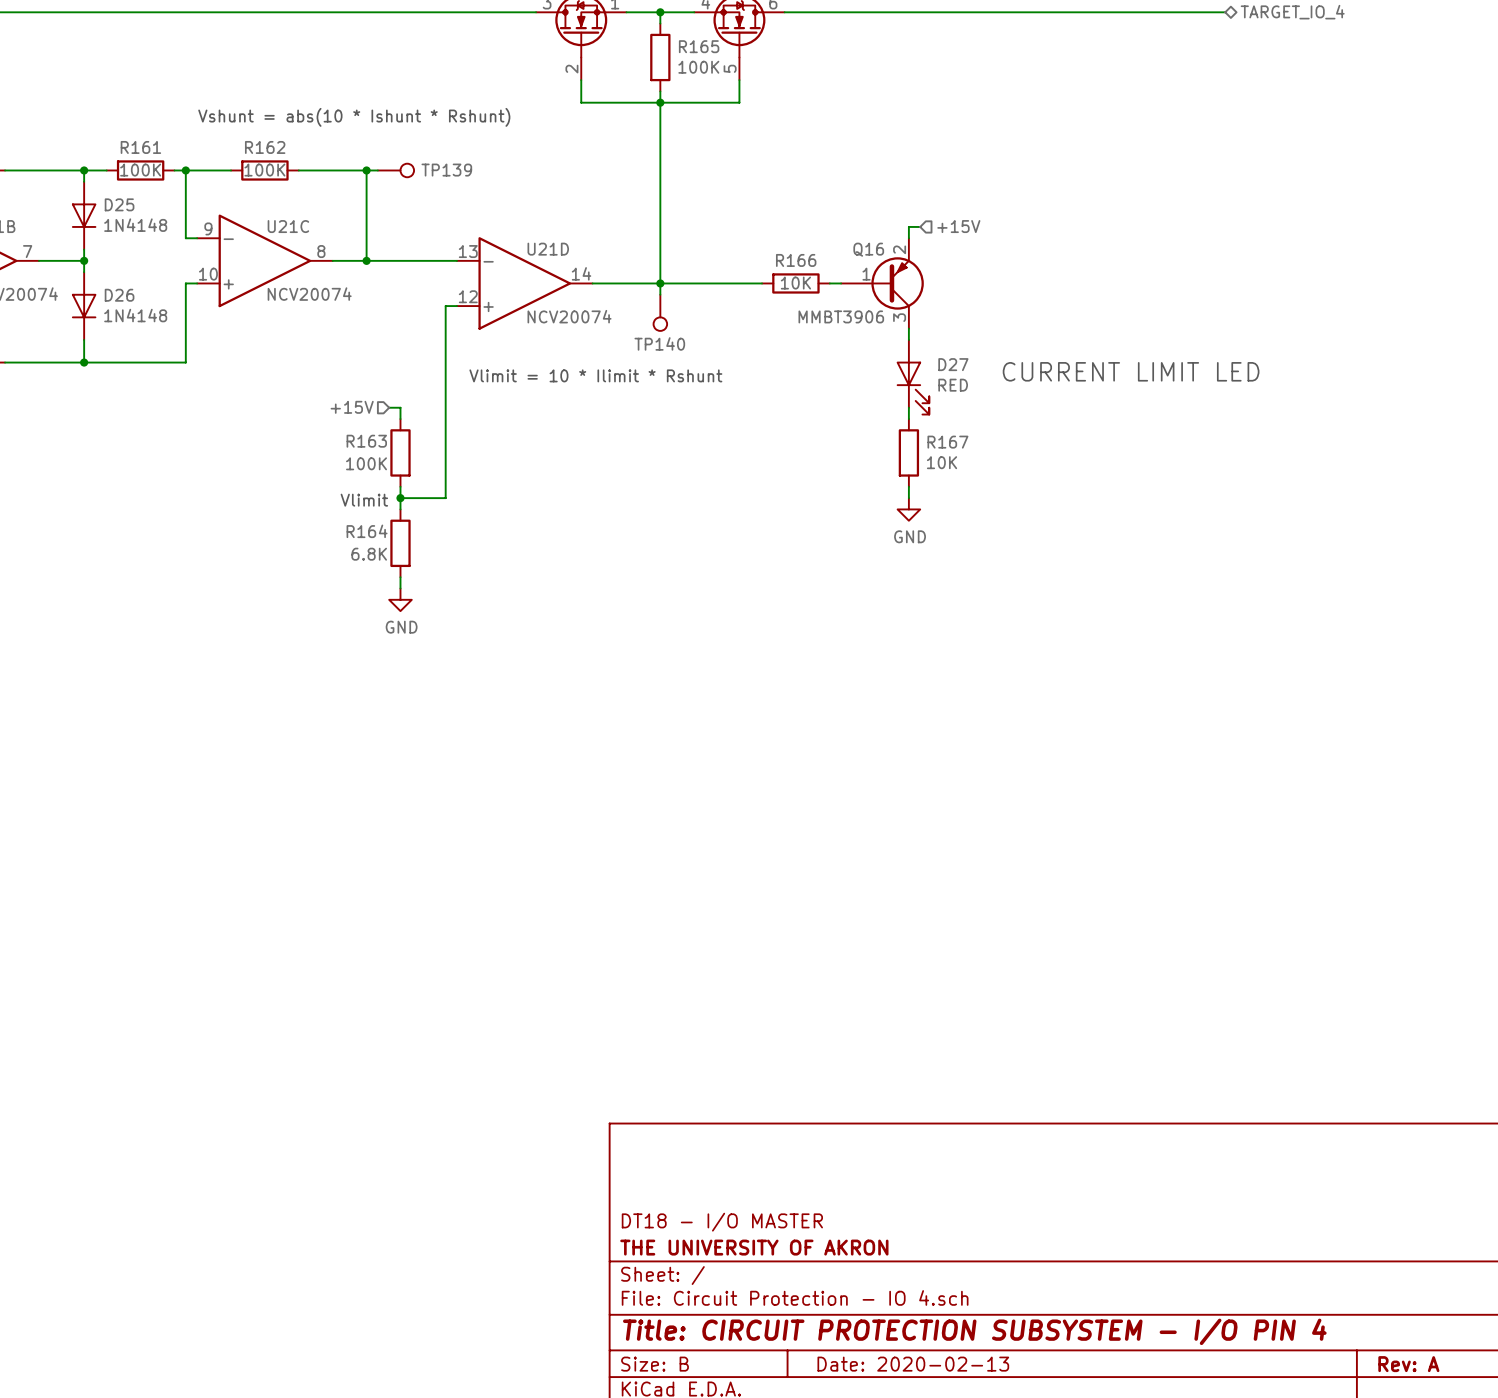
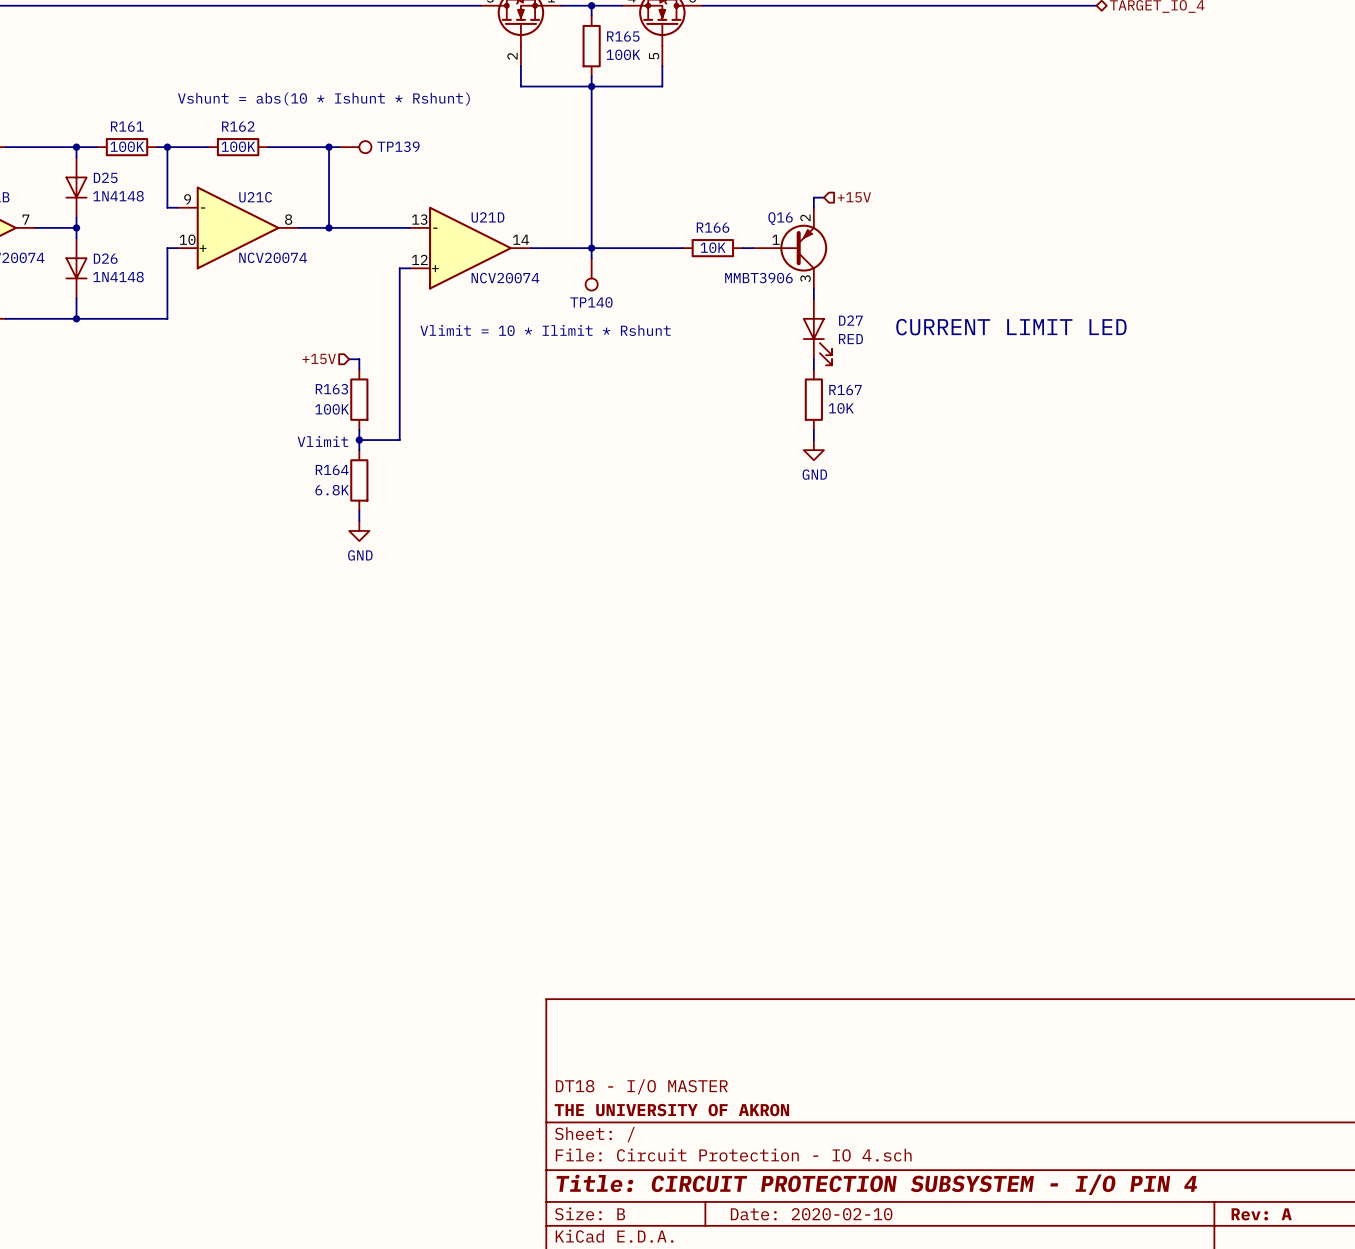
title block: Date: 2020-02-13 (913, 1364) -> Date: 2020-02-10 (811, 1214)

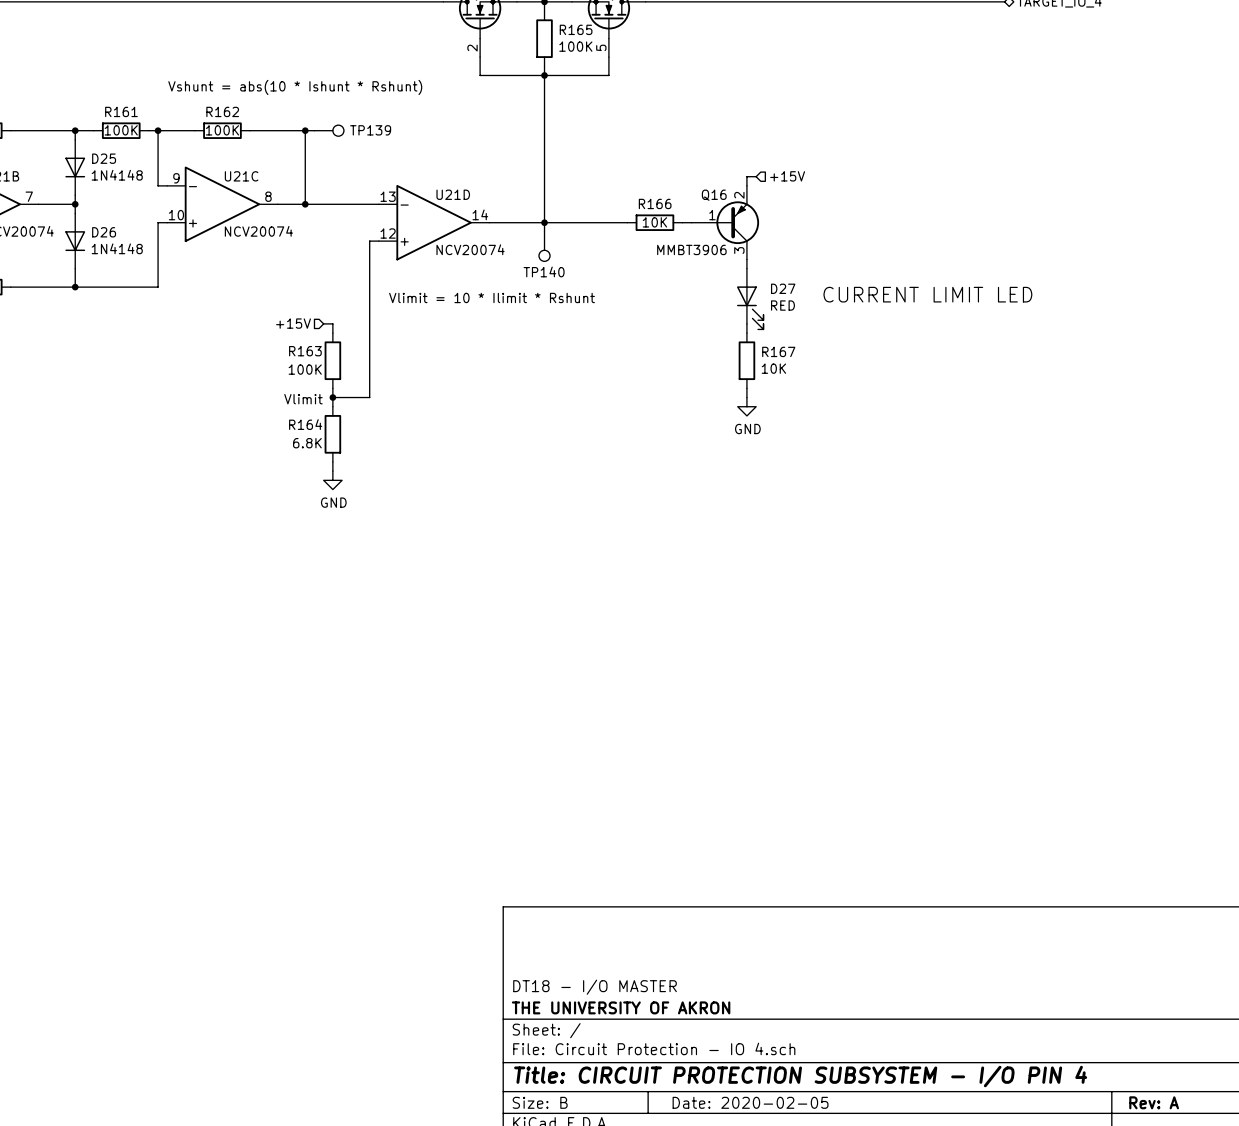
title block: Date: 2020-02-10 (811, 1214) -> Date: 2020-02-05 (750, 1102)

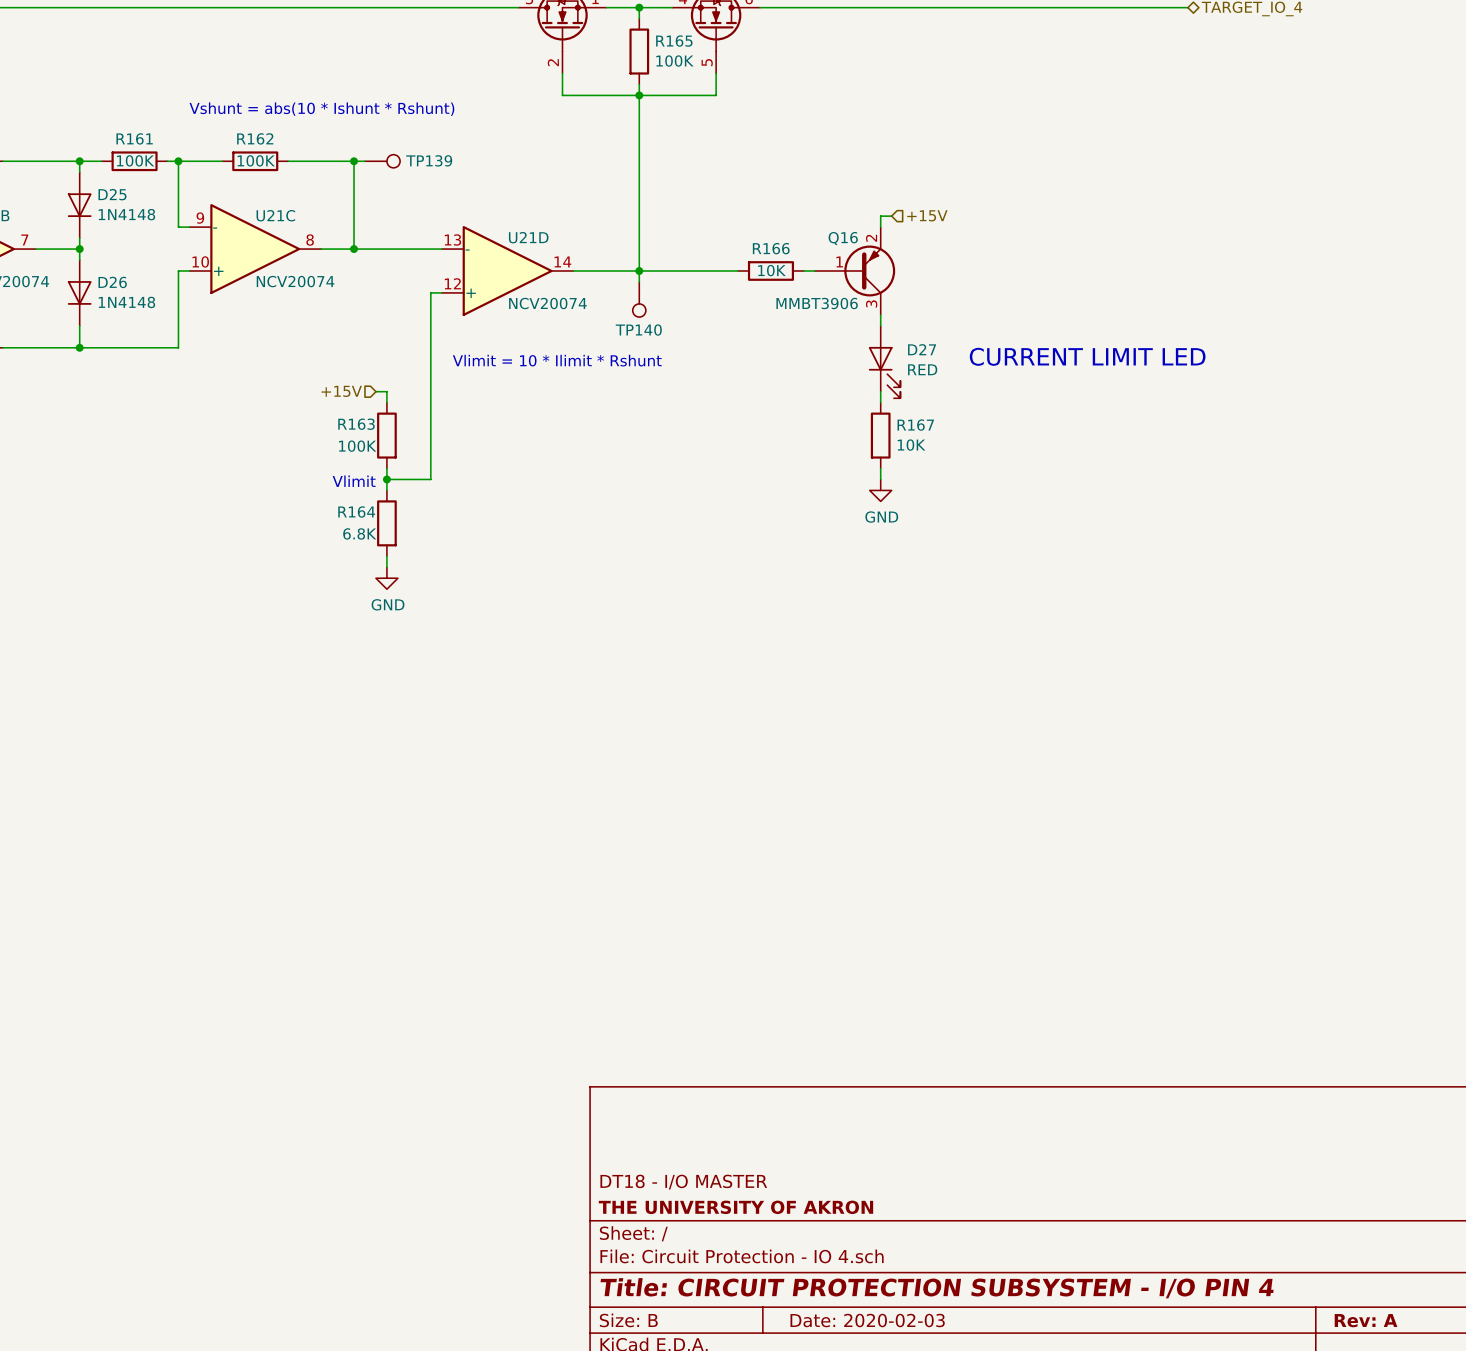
title block: Date: 2020-02-05 (750, 1102) -> Date: 2020-02-03 (867, 1320)

